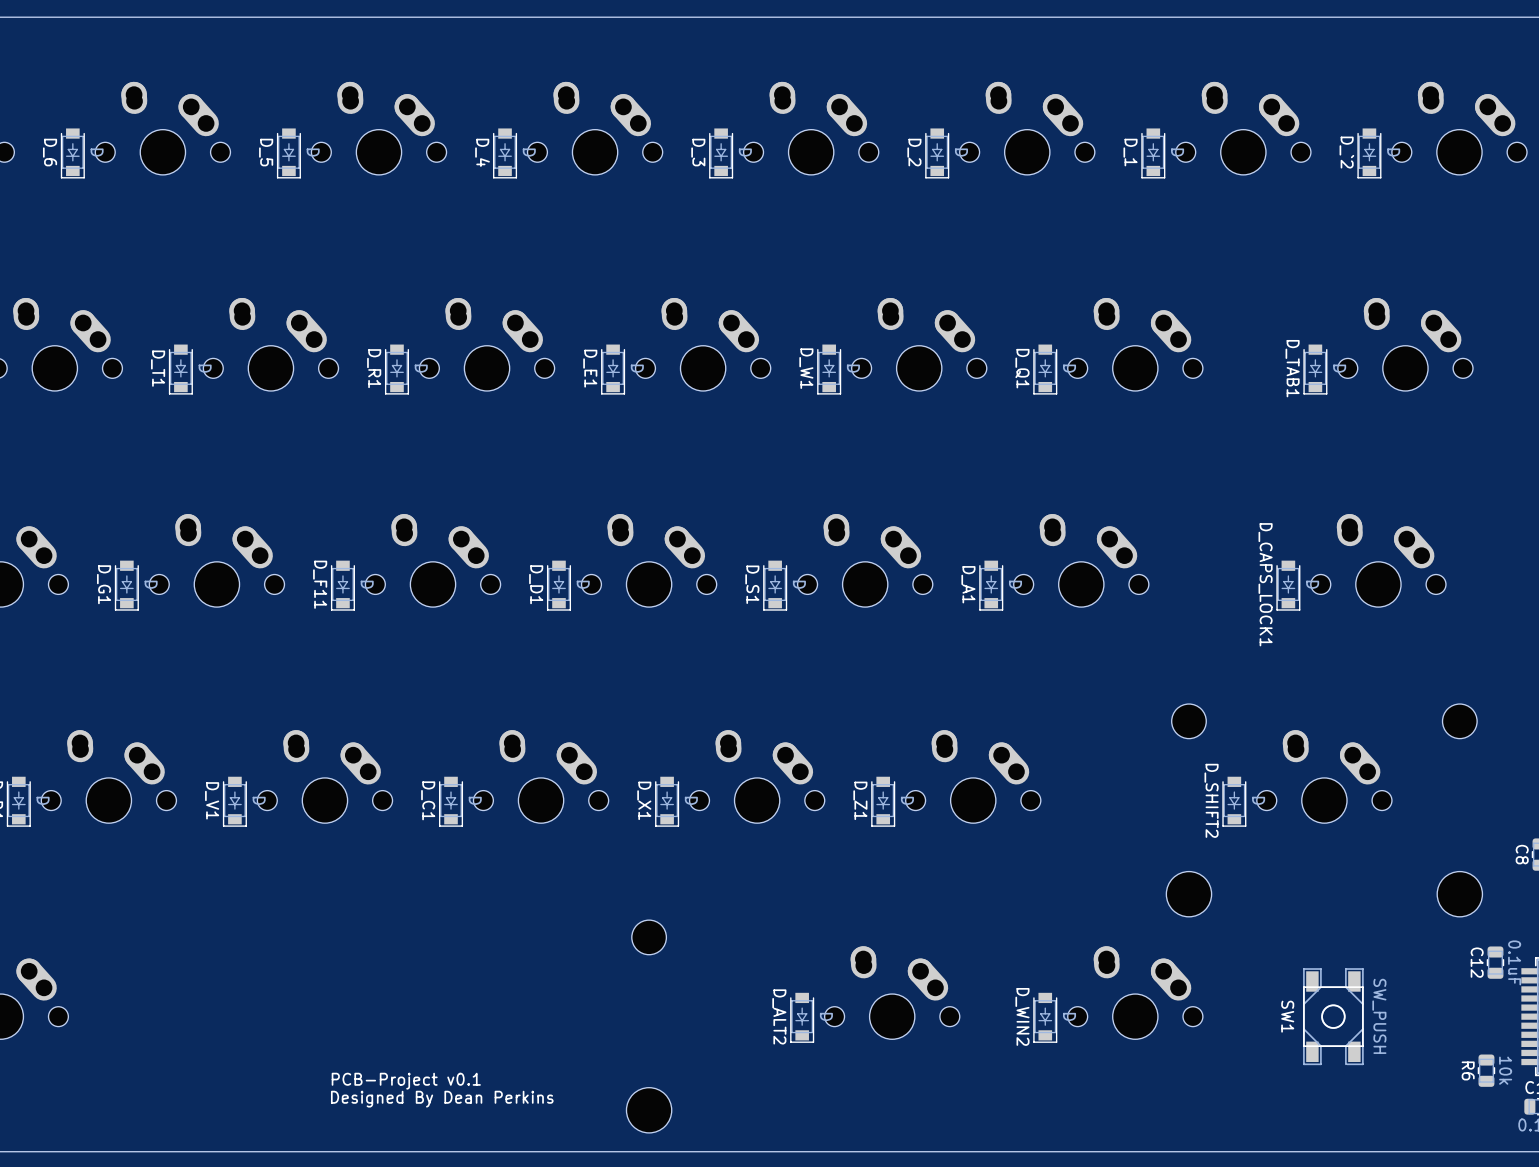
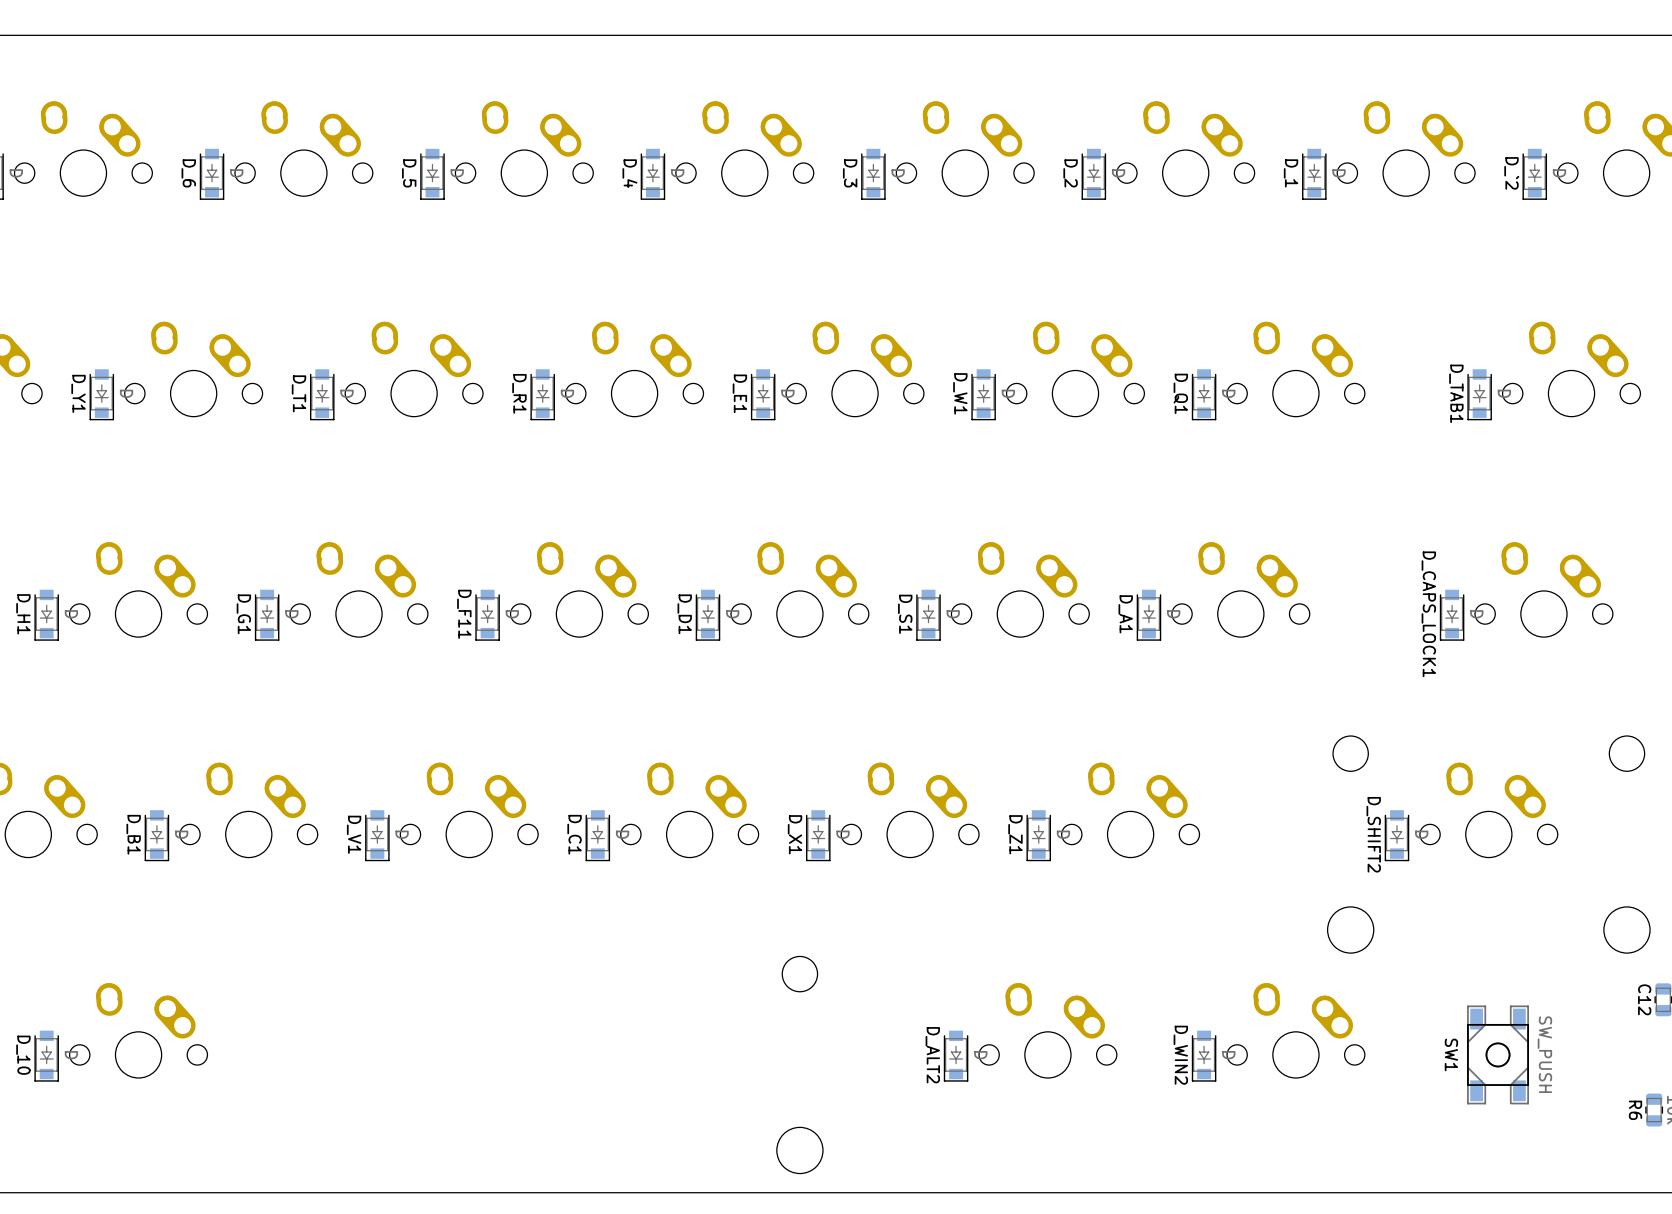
text: PCB-Project v0.1 (406, 1081) -> none
text: Designed By Dean Perkins (442, 1099) -> none

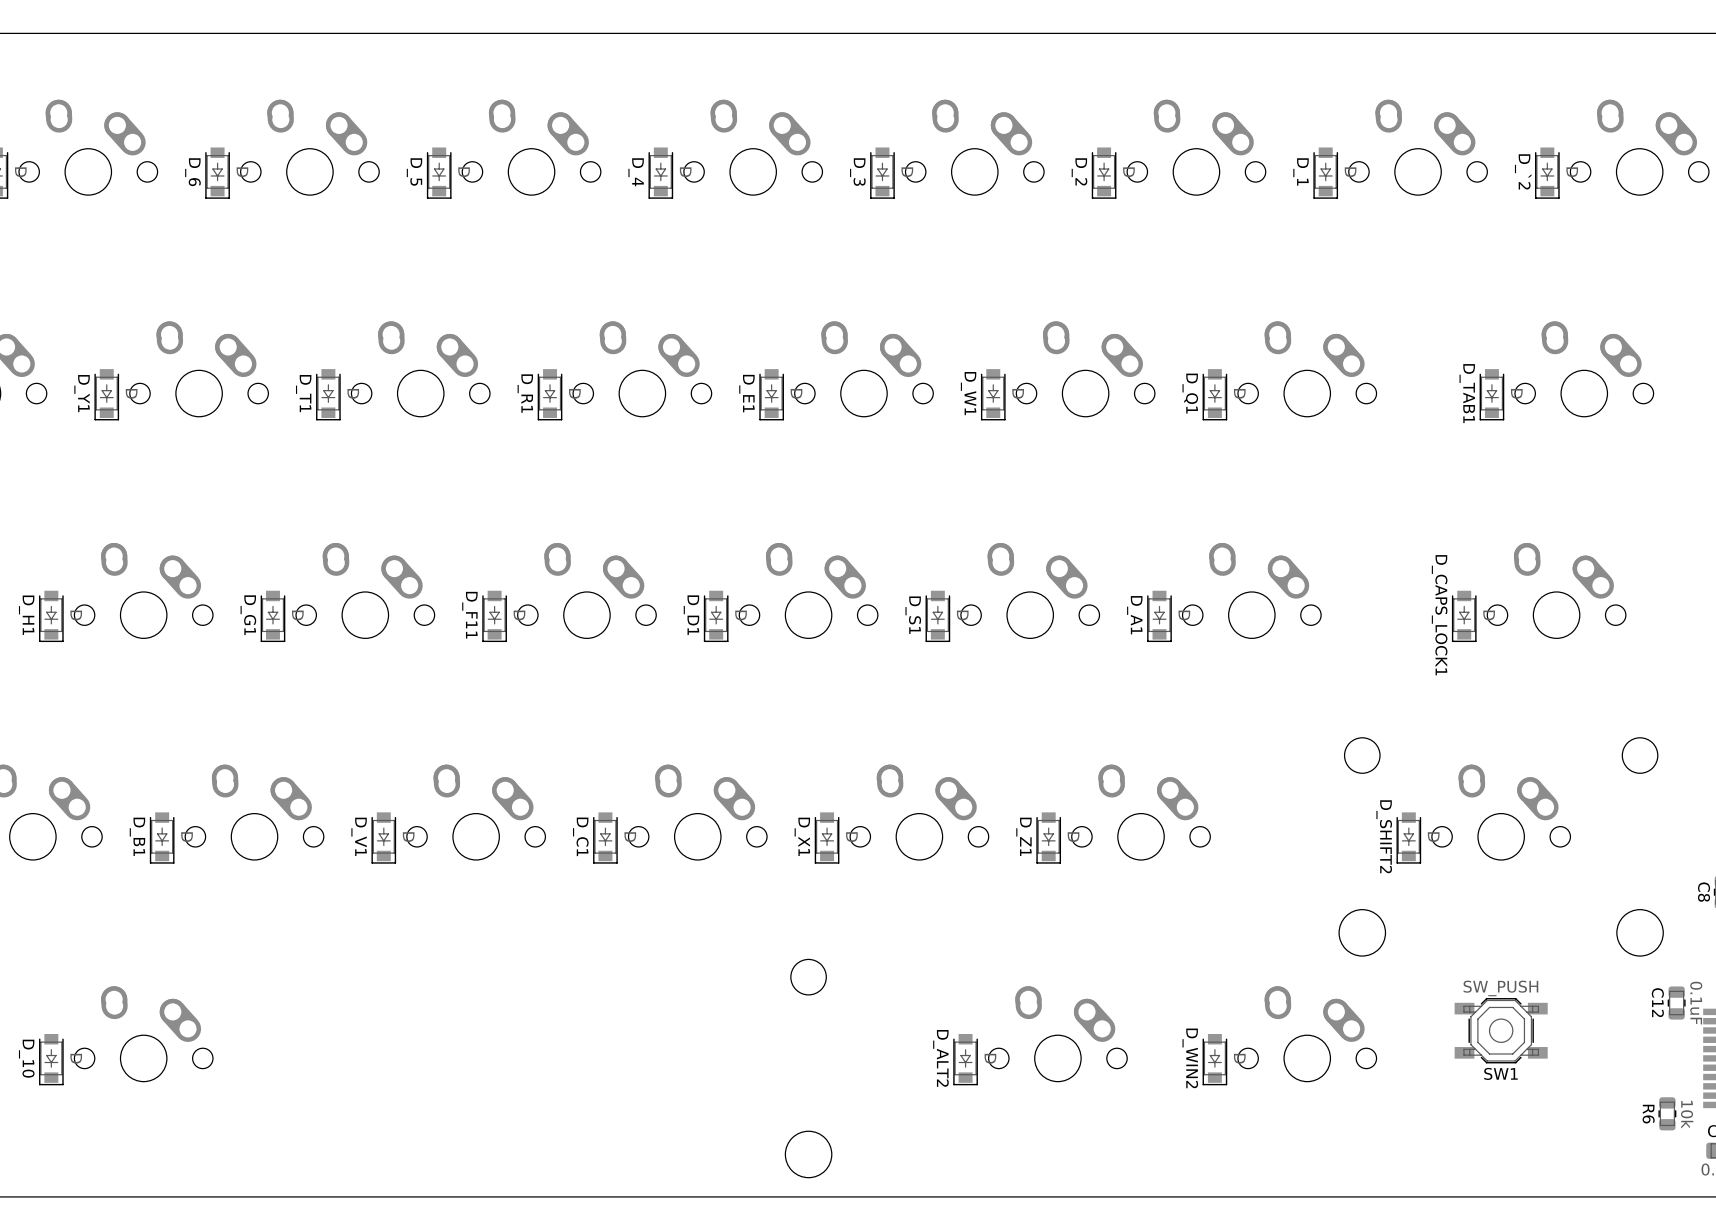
SW1 footprint: [1467, 1005, 1529, 1105] -> [1454, 998, 1548, 1064]
SW1 name position: SW1 (1451, 1054) -> SW1 (1500, 1073)
SW1 value position: SW_PUSH (1544, 1054) -> SW_PUSH (1500, 988)

